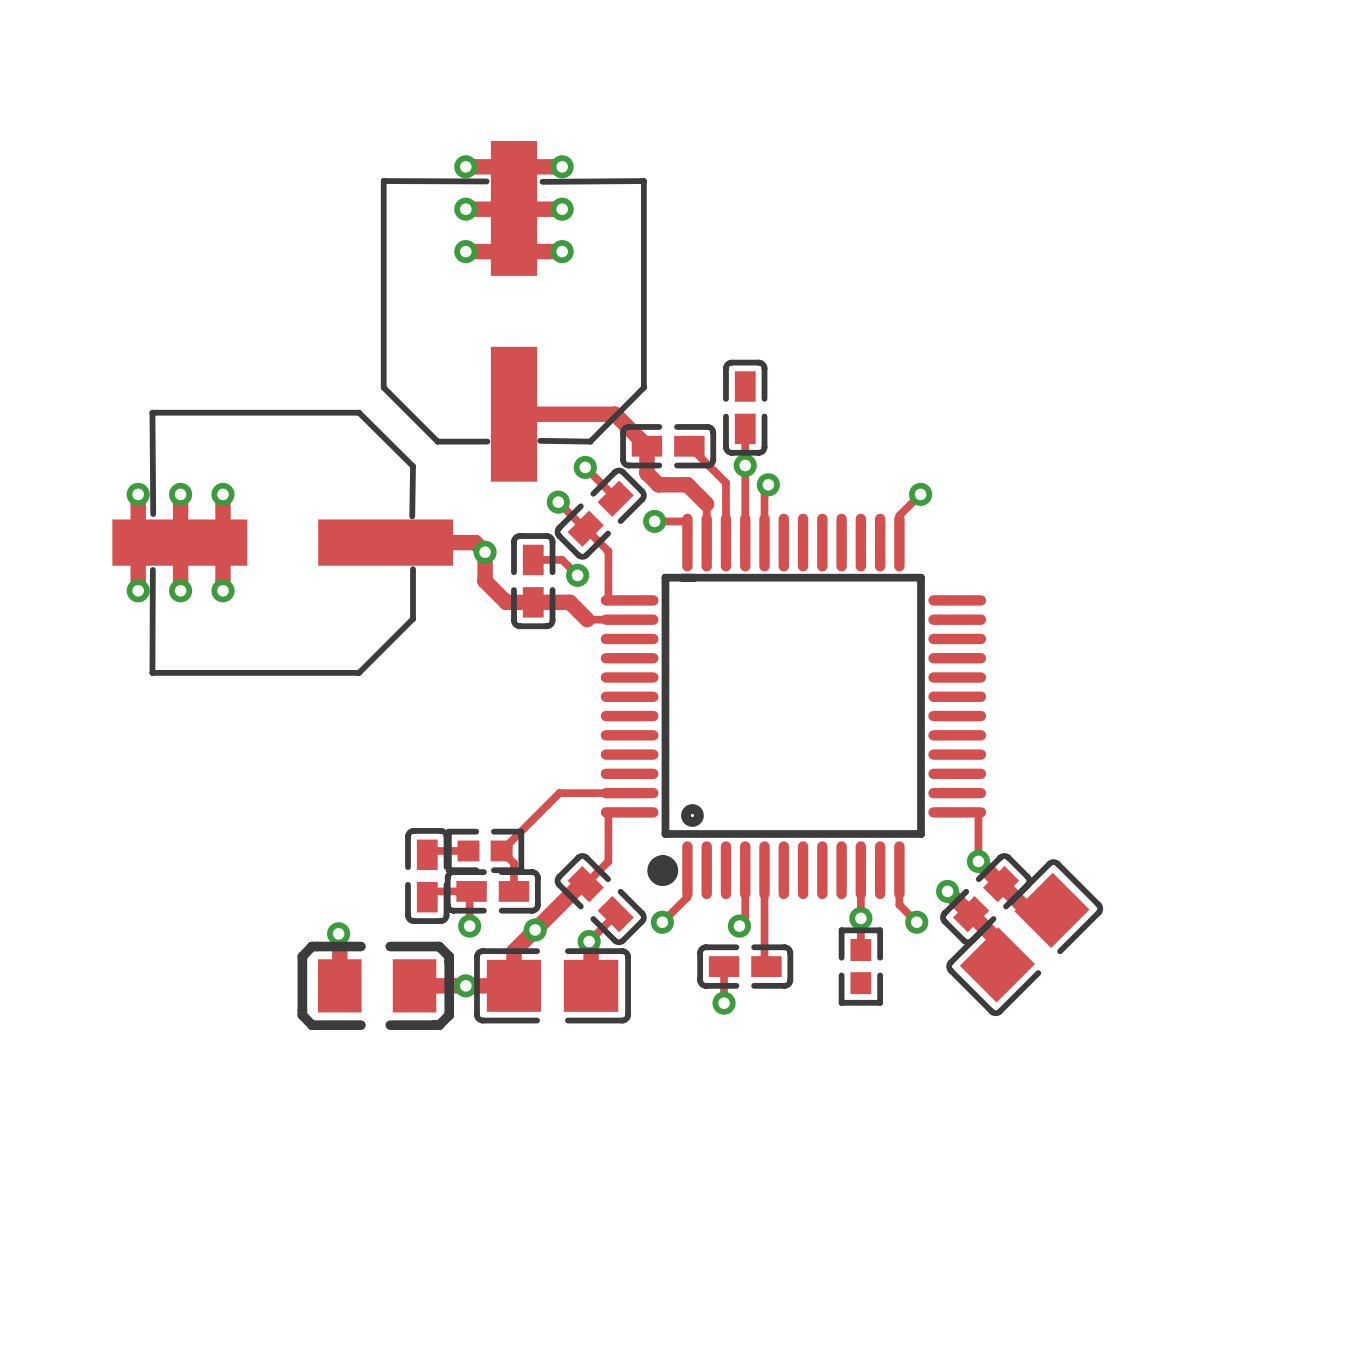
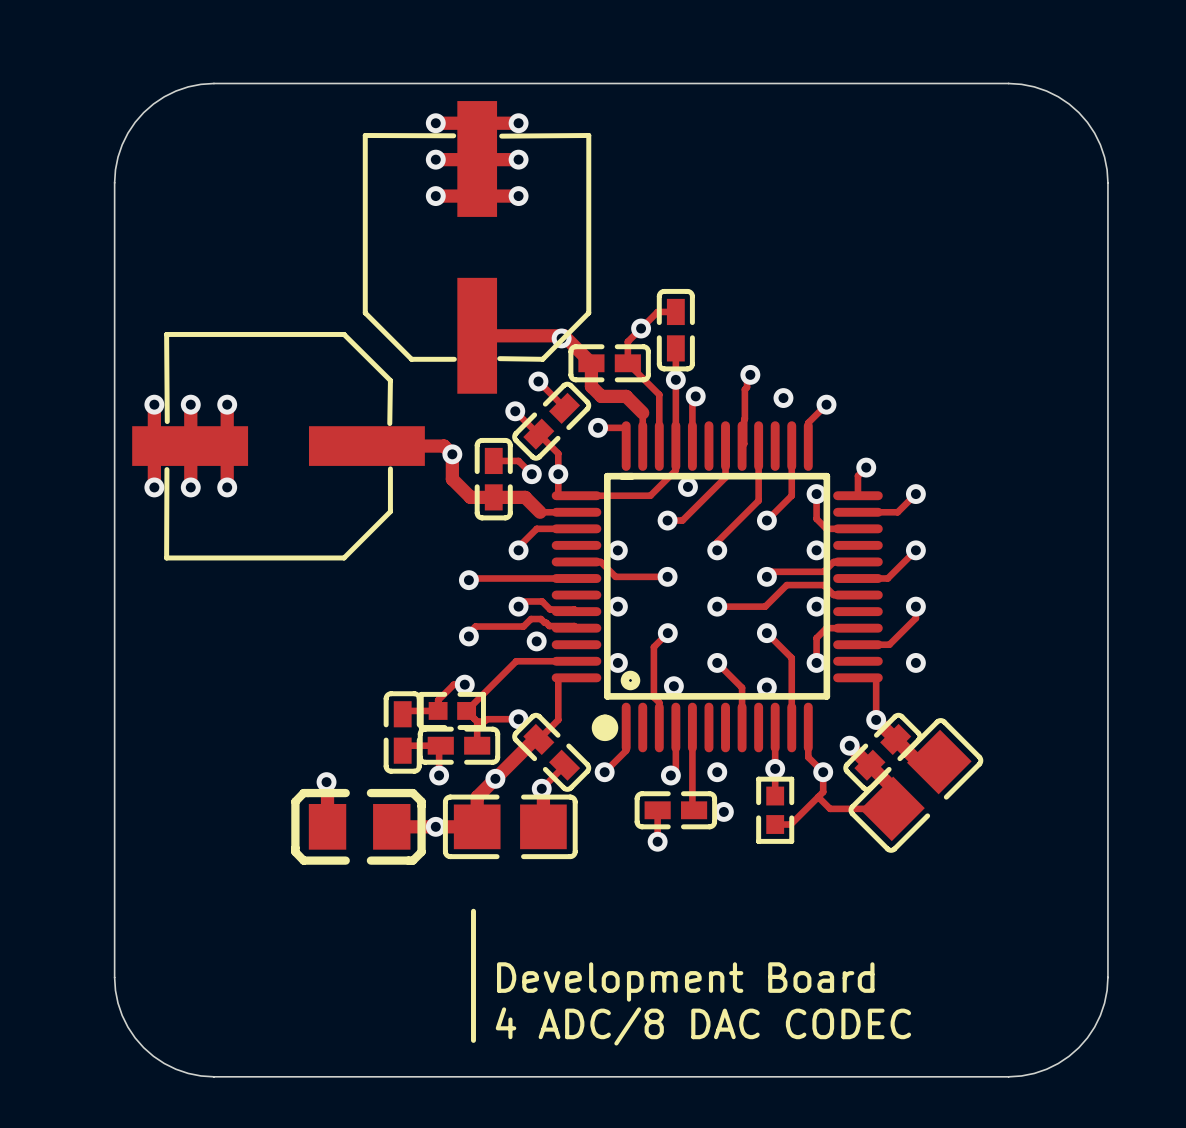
board edge: none -> (213, 83) (1008, 83) (1034, 86) (1046, 91) (1069, 104) (1078, 112) (1087, 122) (1100, 144) (1104, 157) (1107, 182) (1107, 977) (1104, 1003) (1100, 1015) (1087, 1037) (1078, 1047) (1069, 1056) (1046, 1069) (1034, 1073) (1008, 1076) (213, 1076) (188, 1073) (175, 1069) (153, 1056) (143, 1047) (135, 1037) (122, 1015) (118, 1003) (114, 977) (115, 169) (118, 157) (127, 133) (135, 122) (153, 104) (164, 96) (188, 86) (213, 83)
track: none -> (675, 311) (657, 311) (627, 341) (627, 363)
via: none -> (641, 328)
via: none -> (561, 338)
track: none -> (750, 374) (747, 378) (747, 387) (744, 389) (744, 443) (742, 446)
via: none -> (750, 374)
via: none -> (783, 398)
track: none -> (675, 446) (675, 470) (650, 495) (576, 495)
track: none -> (725, 446) (725, 477) (682, 520) (667, 520)
track: none -> (758, 446) (758, 500) (717, 542) (717, 550)
track: none -> (791, 446) (791, 495) (766, 520)
track: none -> (866, 467) (857, 475) (857, 495)
via: none -> (866, 467)
via: none -> (558, 474)
via: none -> (687, 486)
track: none -> (816, 494) (816, 518) (826, 528) (857, 528)
via: none -> (816, 494)
track: none -> (915, 494) (897, 512) (857, 512)
via: none -> (915, 494)
via: none -> (667, 520)
via: none -> (766, 520)
track: none -> (576, 528) (536, 528) (515, 550)
via: none -> (518, 550)
via: none -> (617, 550)
via: none -> (717, 550)
via: none -> (816, 550)
track: none -> (915, 550) (887, 578) (857, 578)
via: none -> (915, 550)
track: none -> (576, 561) (600, 561) (615, 576) (664, 576)
track: none -> (857, 561) (833, 561) (823, 571) (771, 571) (766, 576)
via: none -> (667, 576)
via: none -> (766, 576)
track: none -> (576, 578) (467, 578) (465, 580)
via: none -> (468, 580)
track: none -> (857, 595) (833, 595) (823, 585) (786, 585) (765, 606) (717, 606)
track: none -> (515, 606) (520, 601) (542, 601) (550, 609) (574, 609) (576, 611)
via: none -> (518, 606)
via: none -> (617, 606)
via: none -> (717, 606)
via: none -> (816, 606)
track: none -> (915, 606) (915, 618) (889, 644) (857, 644)
via: none -> (915, 606)
track: none -> (576, 628) (574, 626) (549, 626) (540, 619) (531, 619) (523, 626) (475, 626) (465, 636)
track: none -> (857, 628) (826, 628) (816, 638) (816, 662)
track: none -> (667, 633) (653, 647) (653, 697) (659, 702) (659, 727)
via: none -> (667, 633)
track: none -> (766, 633) (791, 657) (791, 727)
via: none -> (766, 633)
via: none -> (468, 636)
via: none -> (536, 641)
via: none -> (617, 662)
track: none -> (717, 662) (742, 687) (742, 727)
via: none -> (717, 662)
via: none -> (816, 662)
via: none -> (915, 662)
track: none -> (464, 684) (453, 684) (438, 700) (438, 710)
via: none -> (464, 684)
via: none -> (673, 686)
via: none -> (766, 687)
track: none -> (515, 719) (486, 719) (484, 721) (477, 721)
via: none -> (518, 719)
via: none -> (717, 772)
track: none -> (823, 772) (823, 792) (790, 824) (775, 824)
track: none -> (818, 797) (830, 808) (892, 808)
via: none -> (723, 811)
line: none -> (473, 911) (473, 1040)
text: none -> Development Board (685, 981)
text: none -> 4 ADC/8 DAC CODEC (703, 1026)

